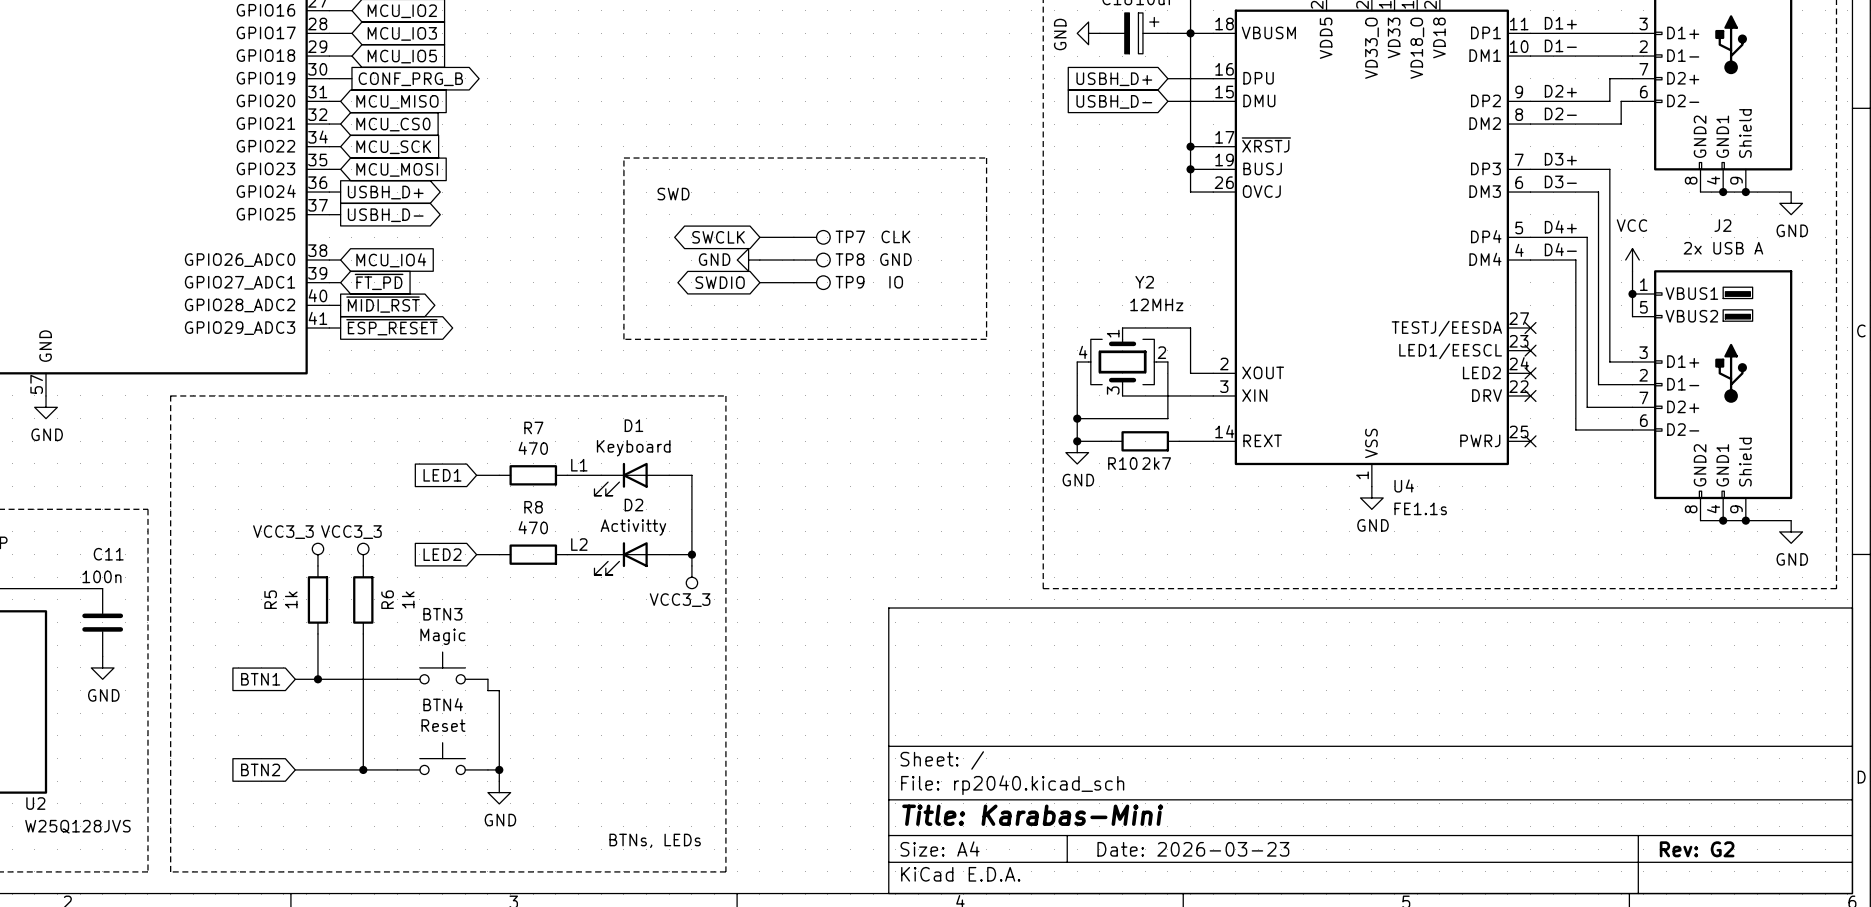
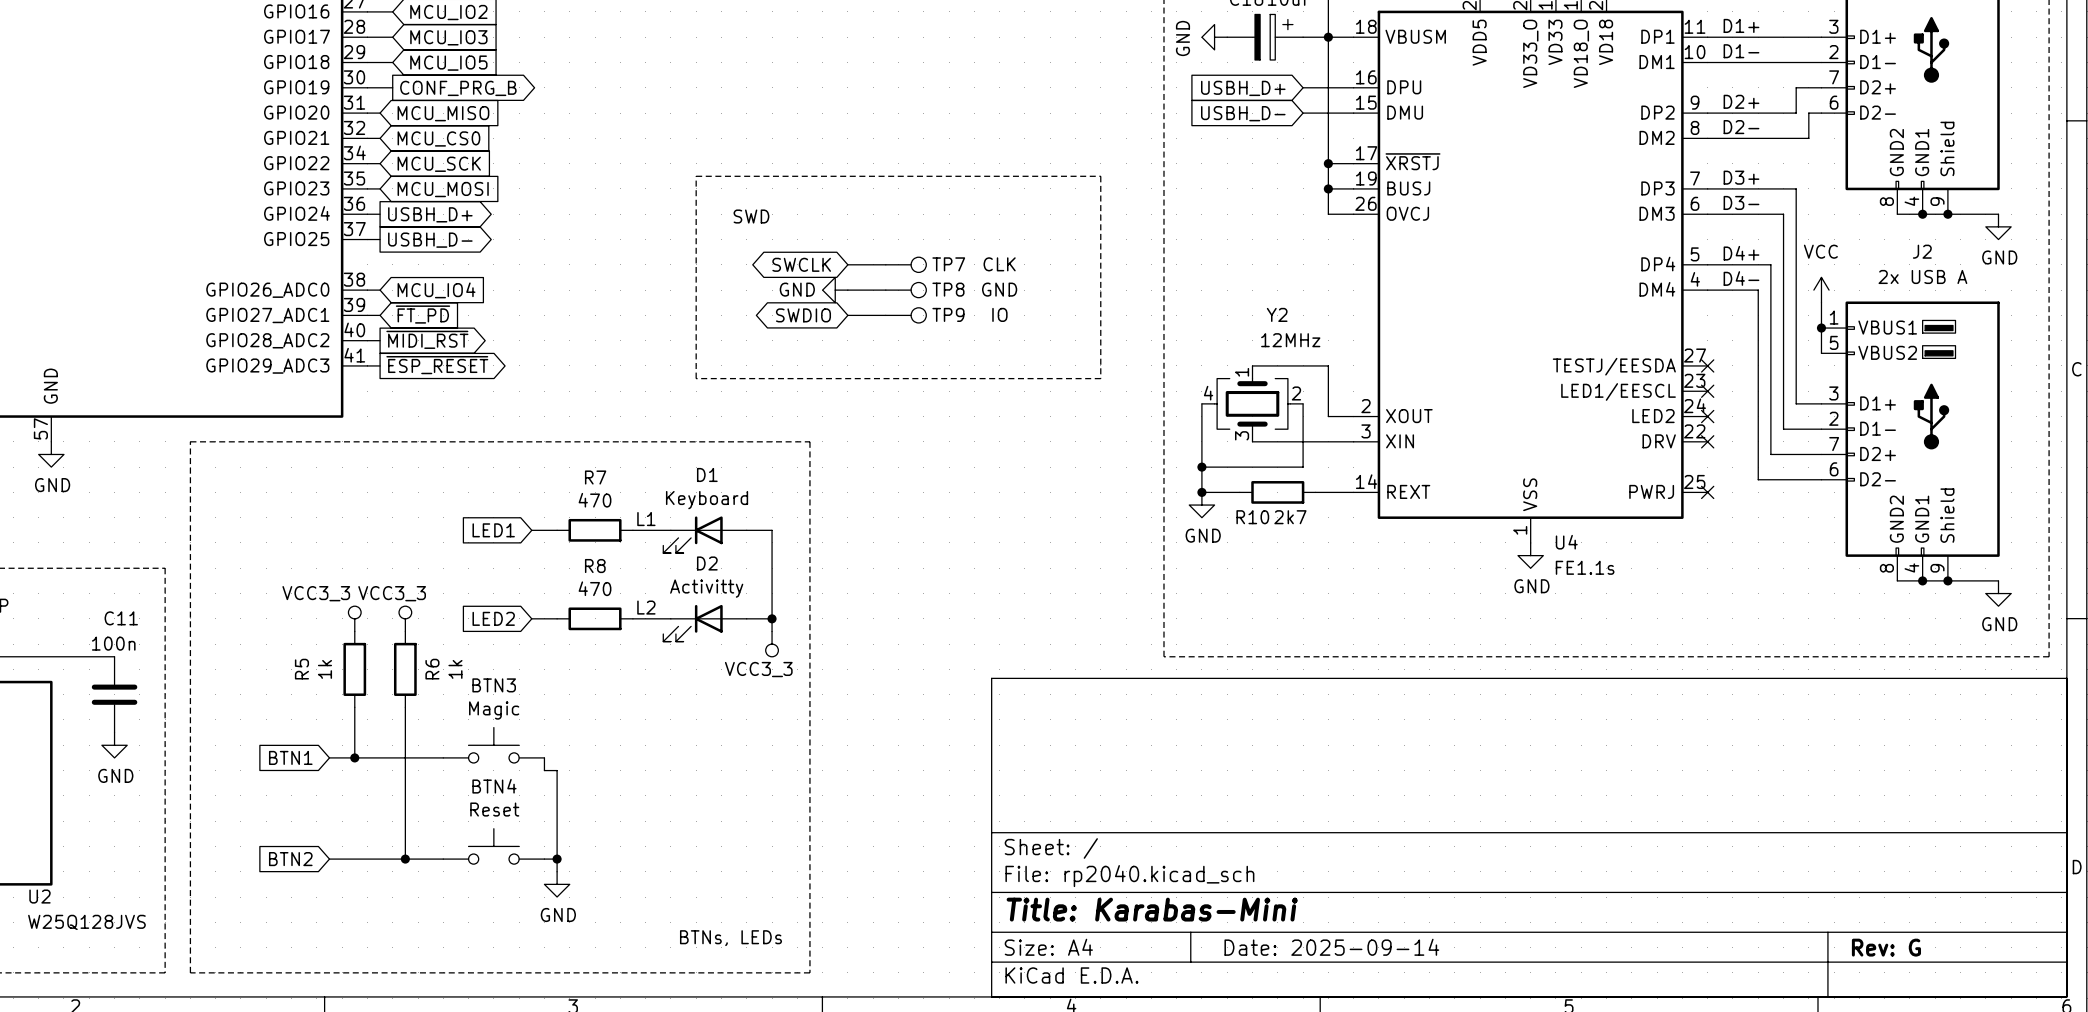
title block: Date: 2026-03-23 (1193, 849) -> Date: 2025-09-14 (1331, 947)
title block: Rev: G2 (1697, 849) -> Rev: G (1886, 947)

